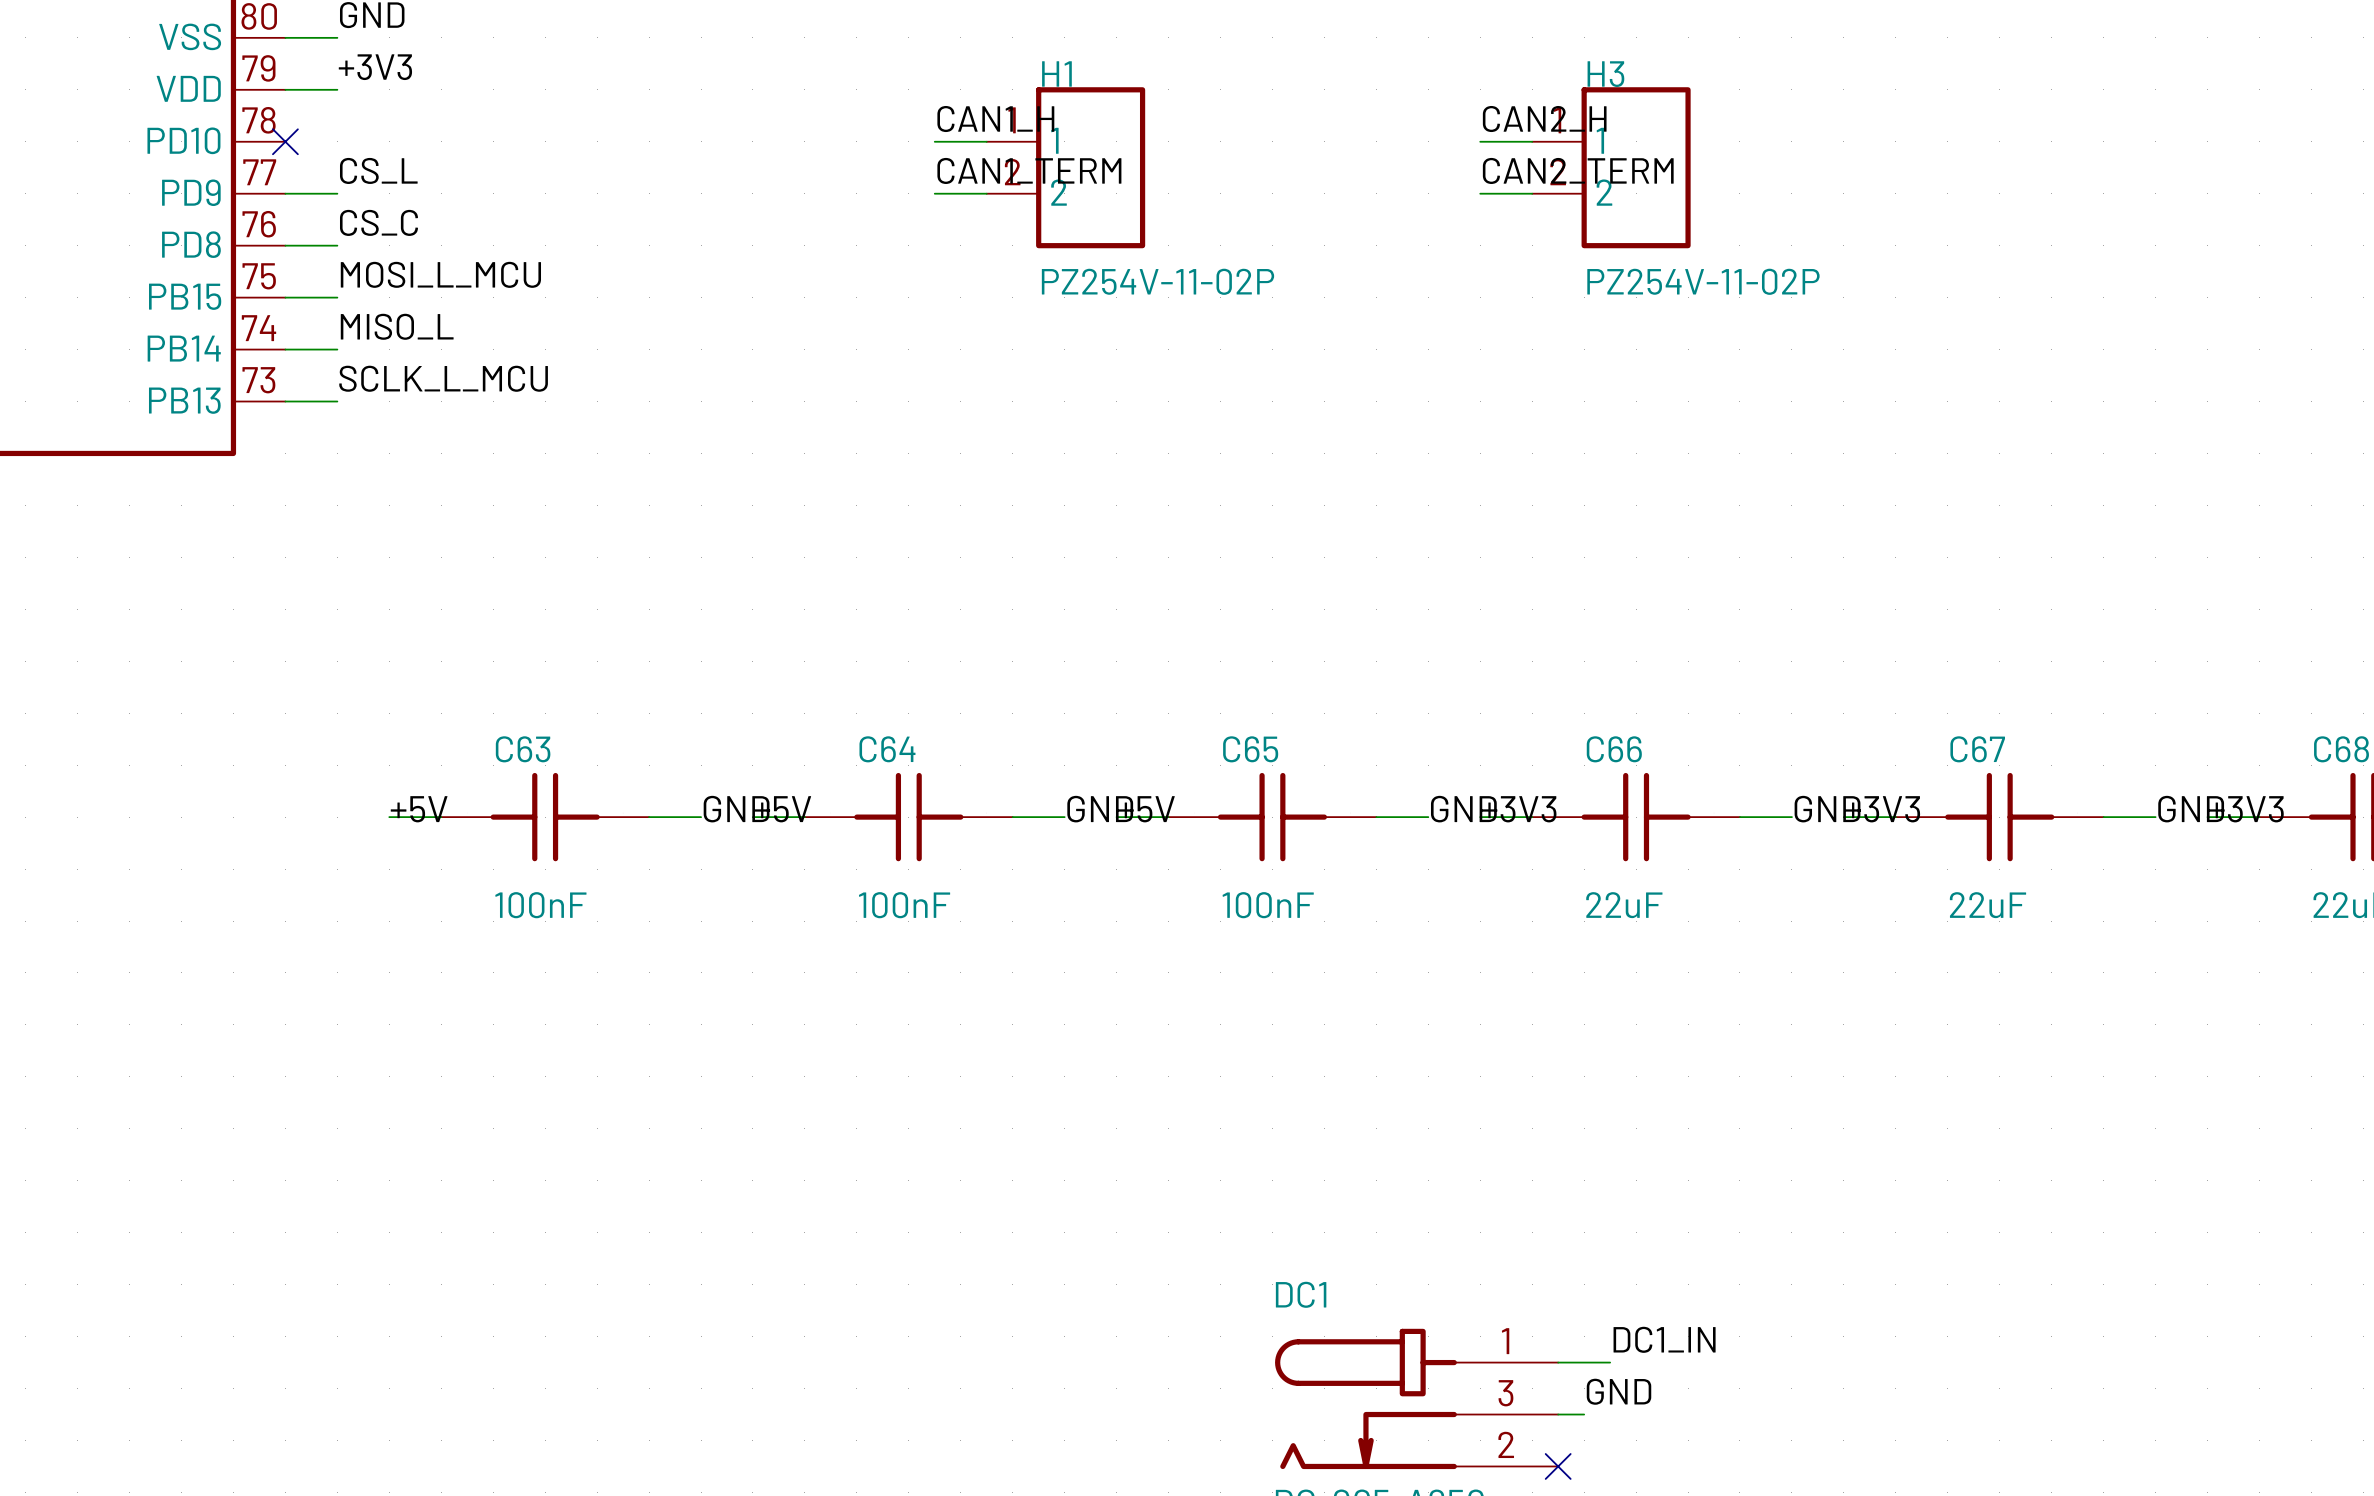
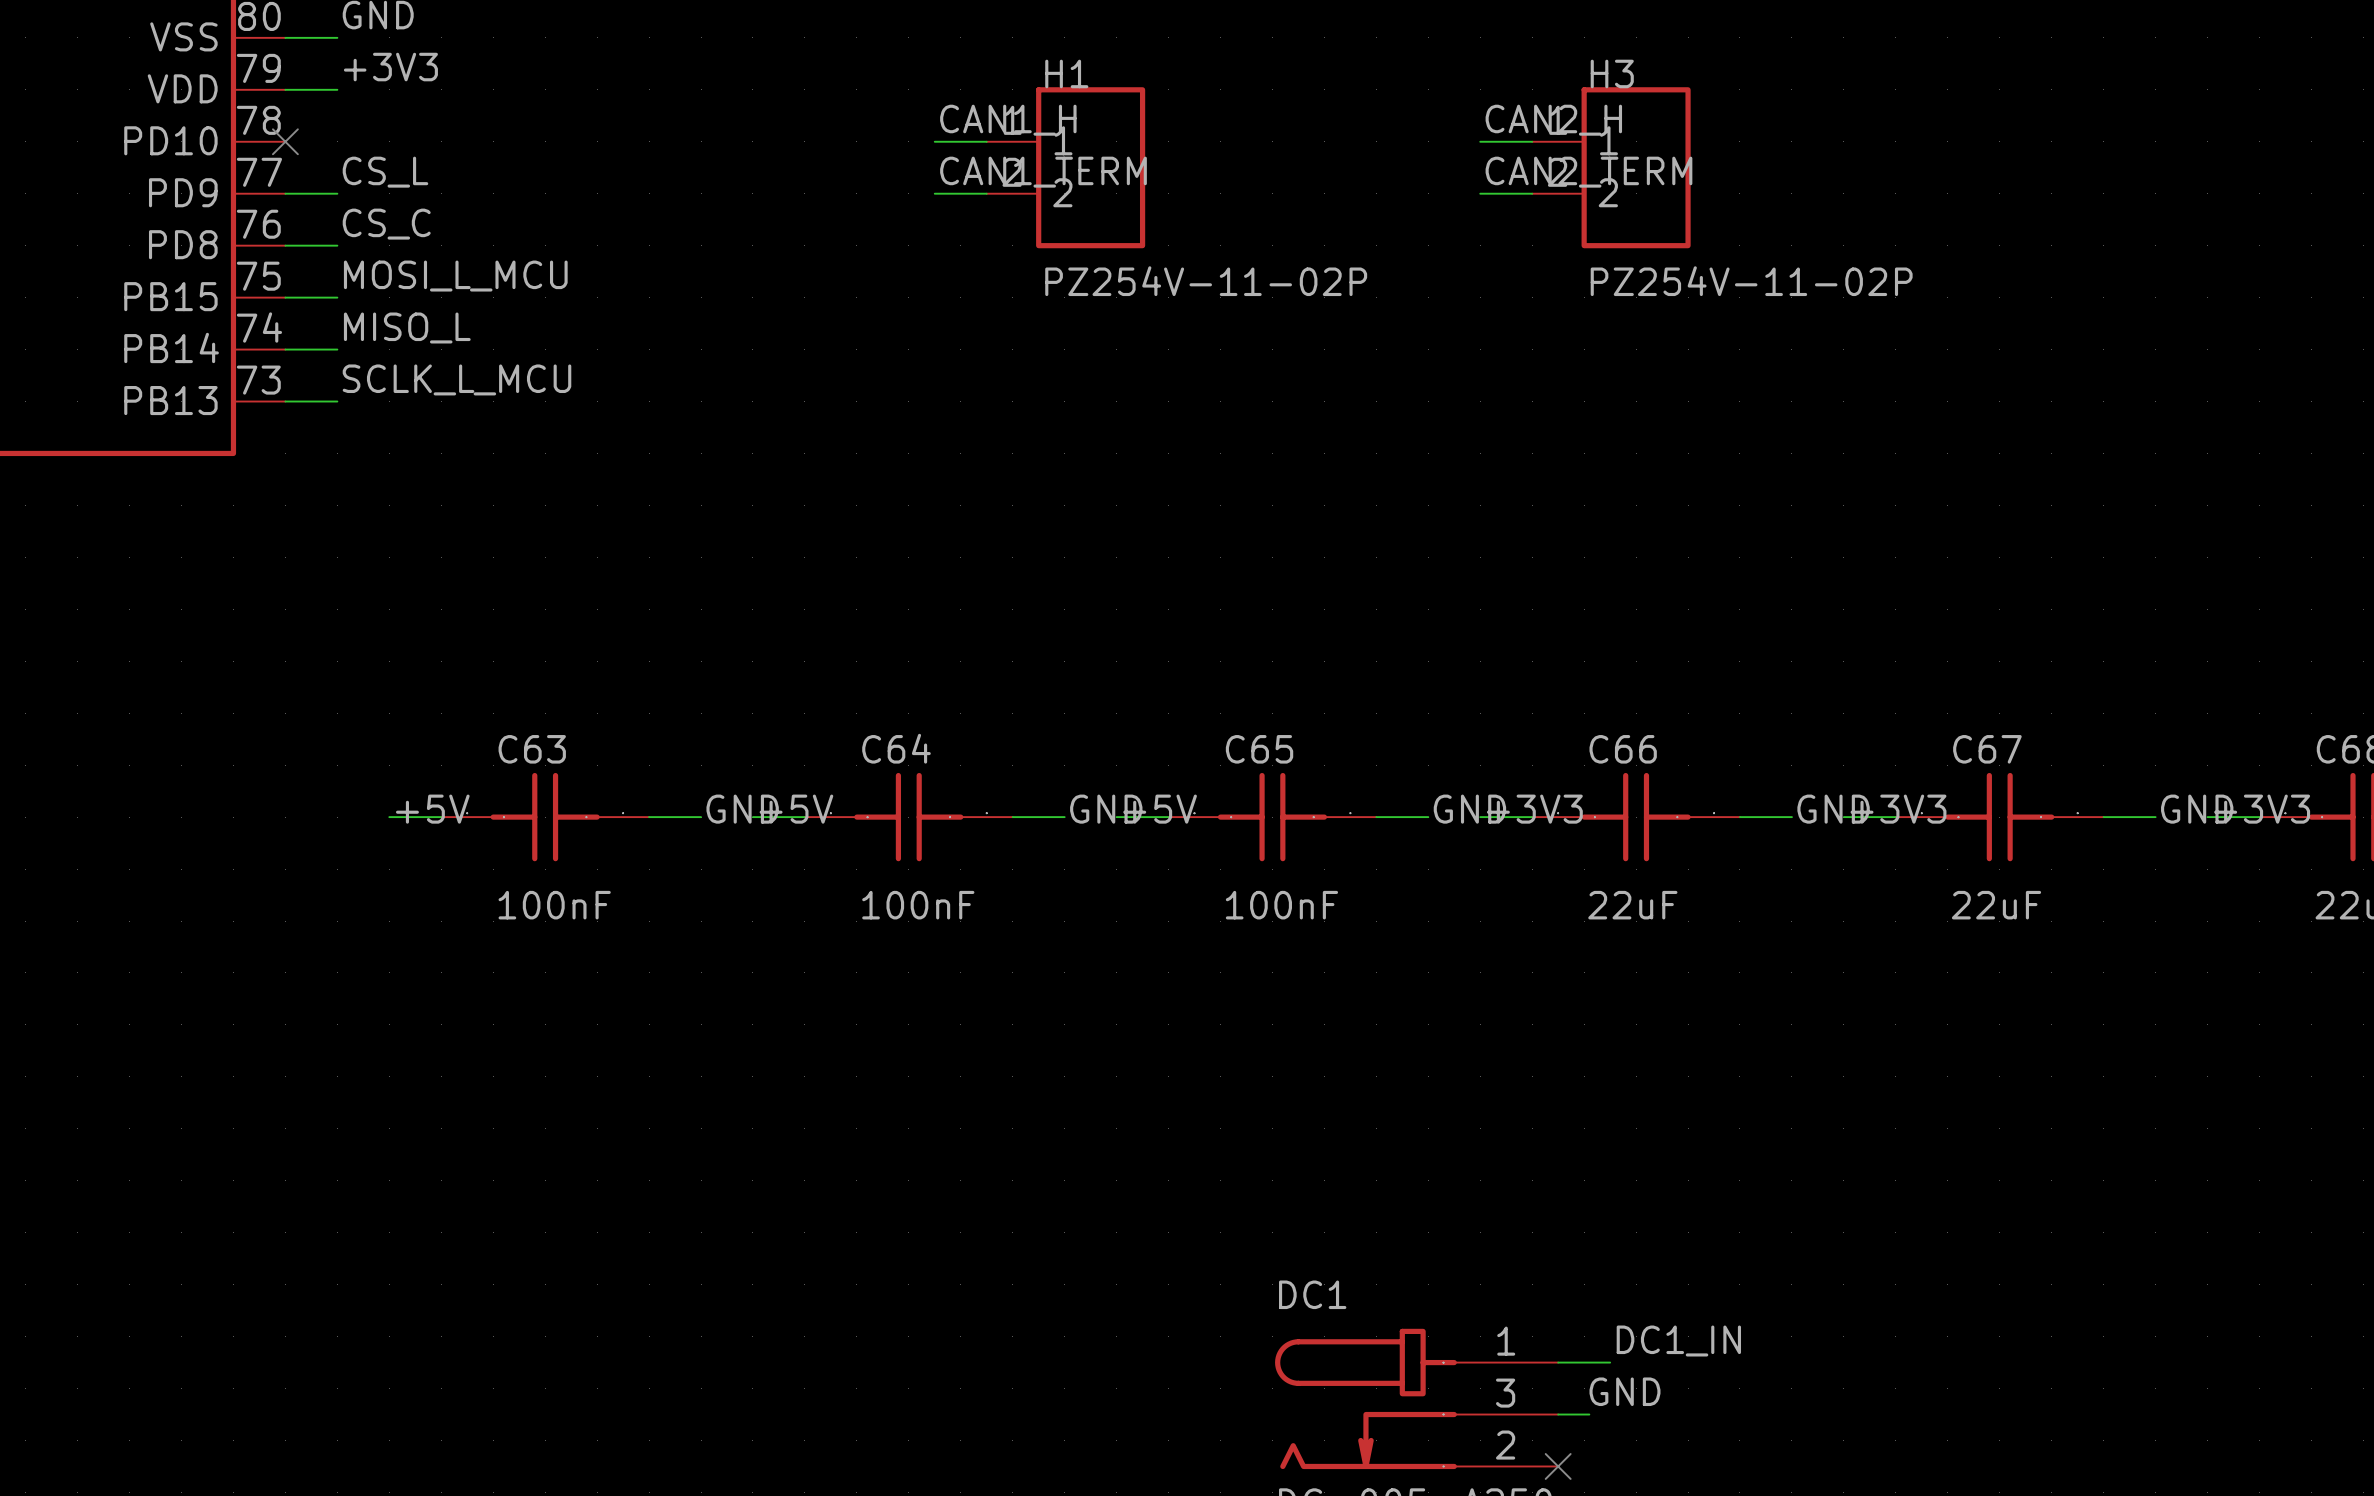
wire: none -> (1584, 1414) (1589, 1414)

